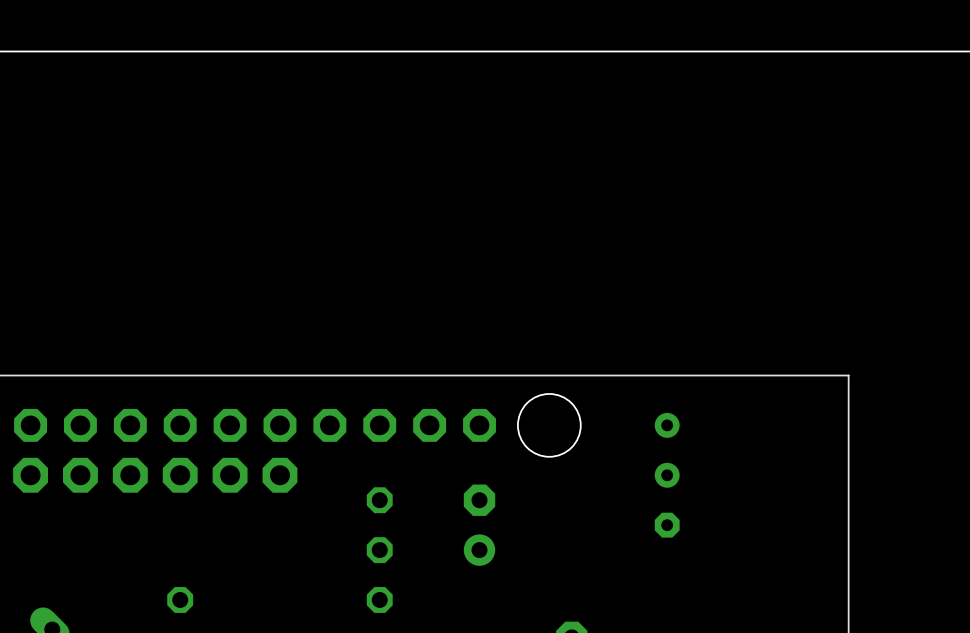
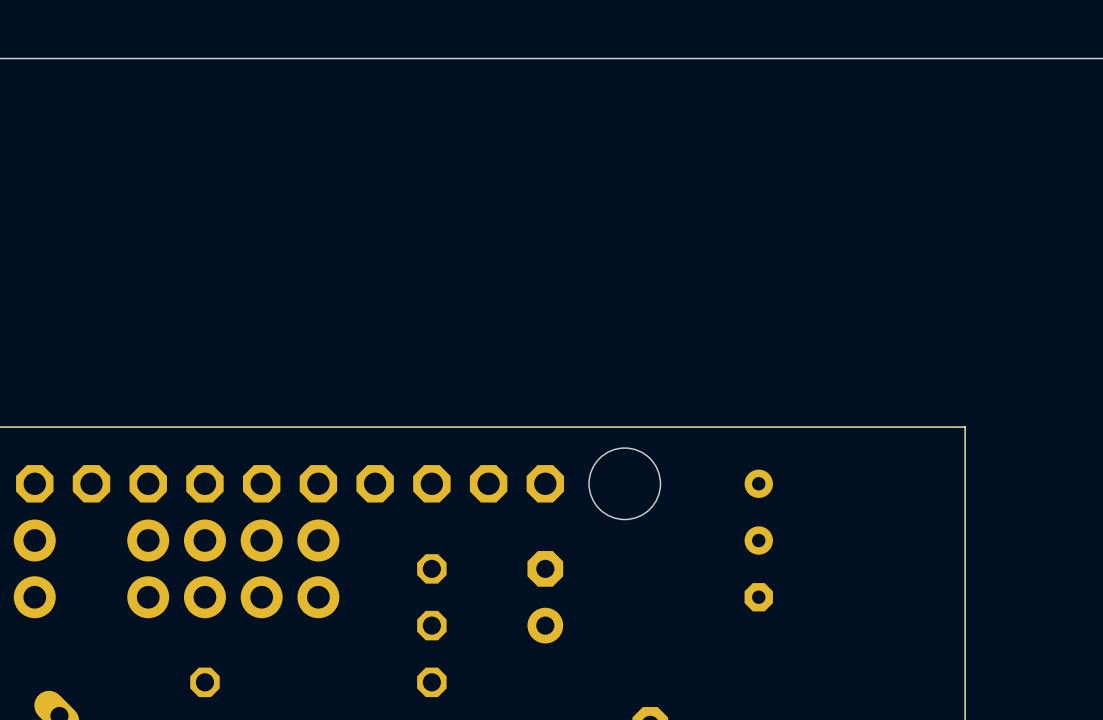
part: (155, 475) -> none
part: none -> (34, 568)
part: none -> (148, 568)
part: none -> (204, 568)
part: none -> (261, 568)
part: none -> (318, 568)

